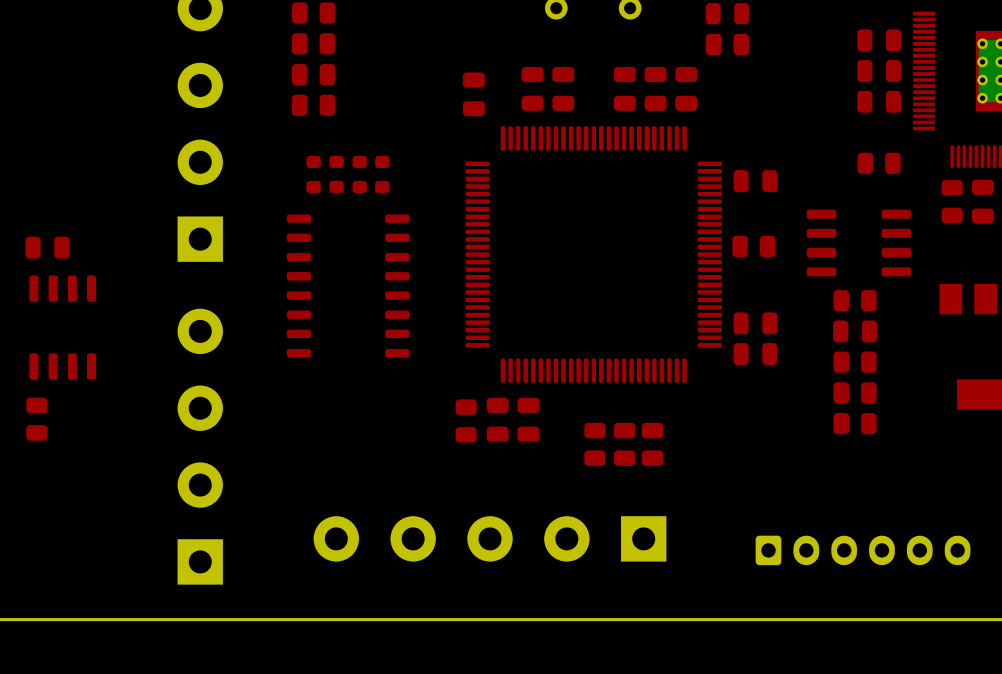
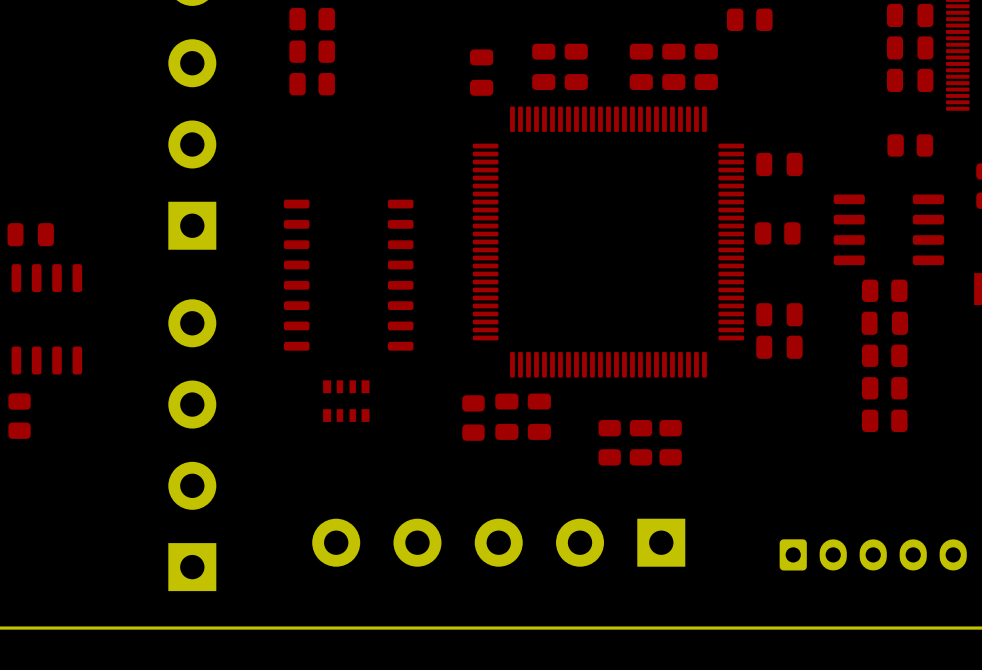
part: (313, 174) -> none
part: (336, 174) -> none
part: (359, 174) -> none
part: (382, 174) -> none
part: none -> (346, 401)

